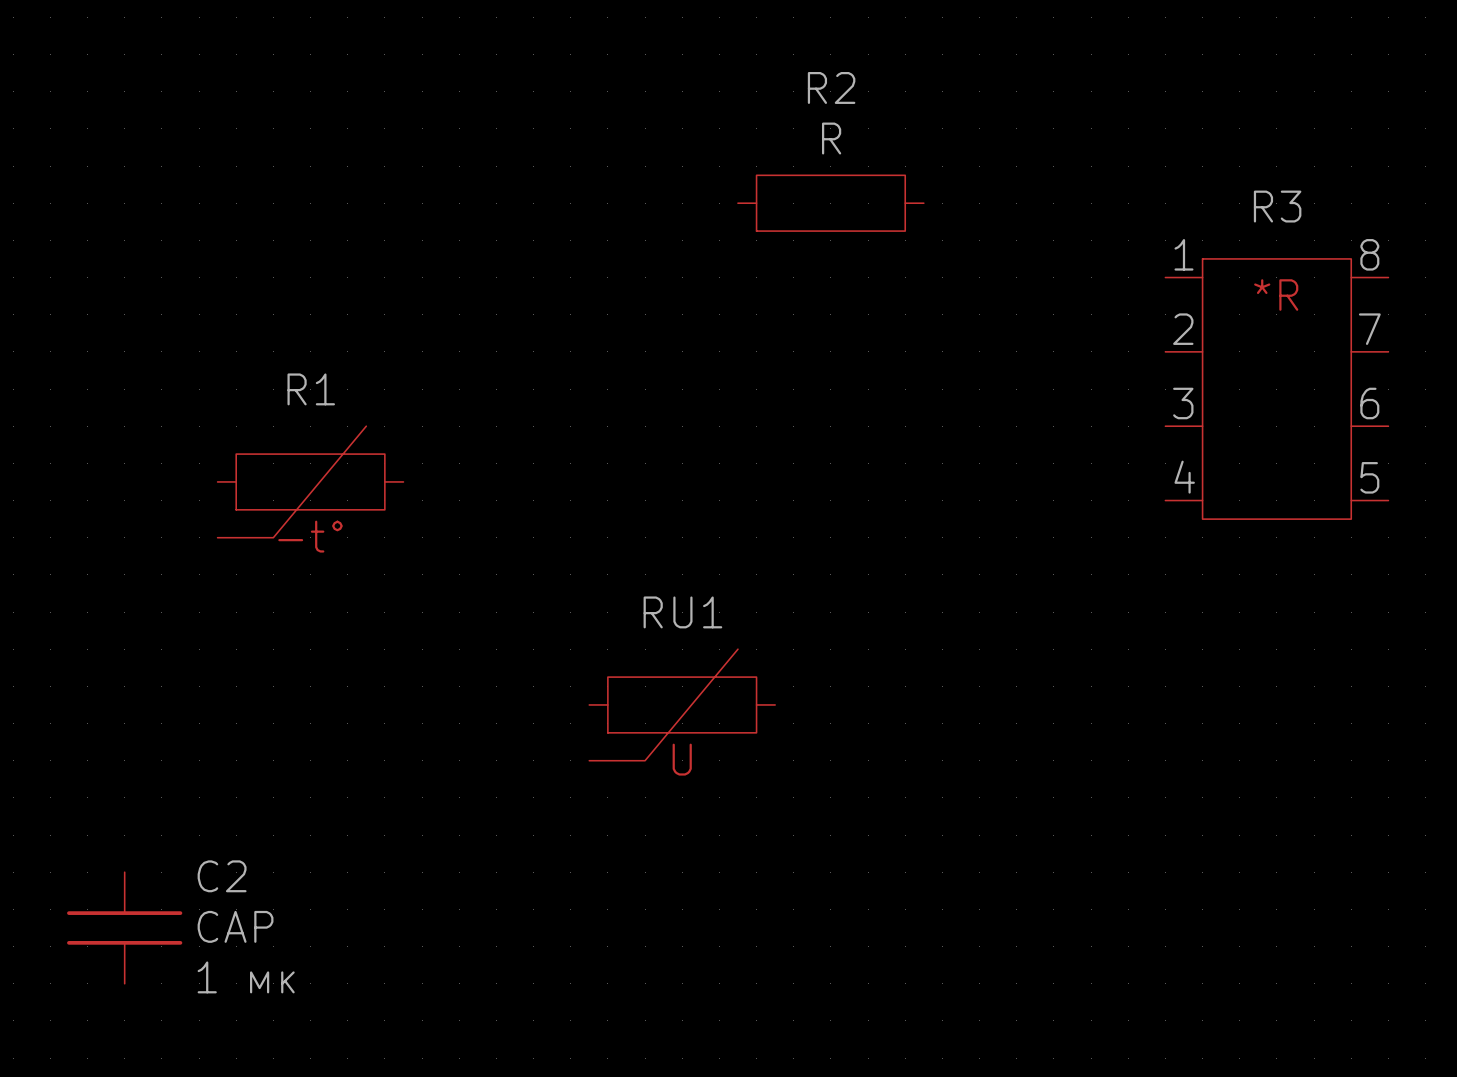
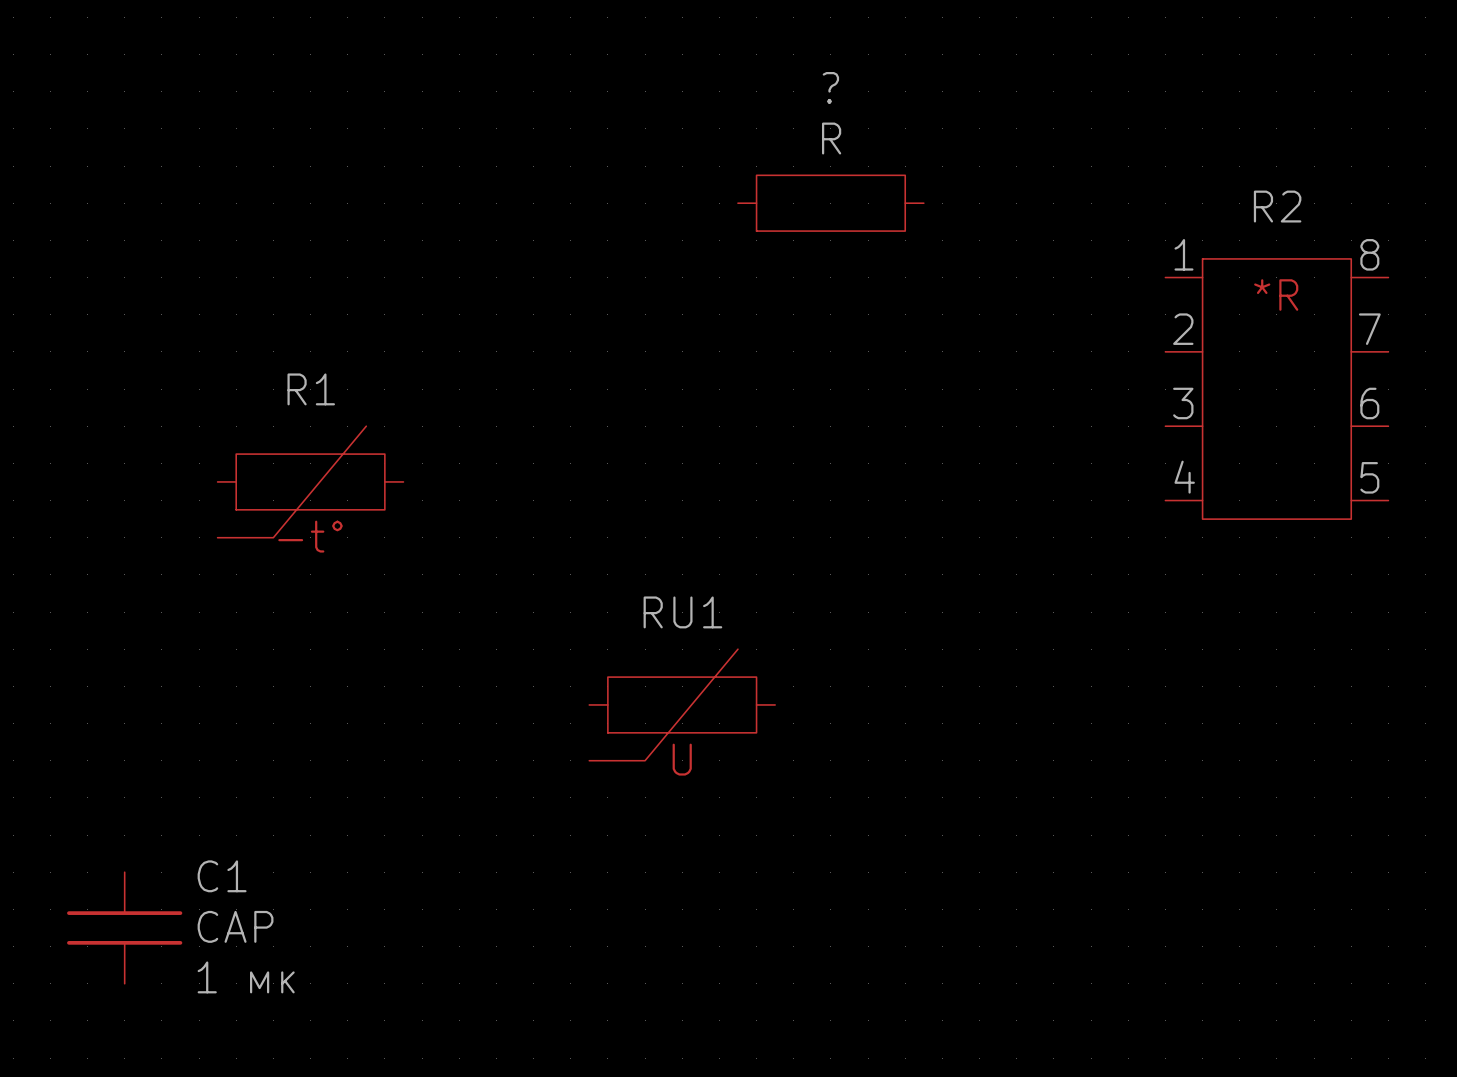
R2 name: R2 (831, 87) -> ? (830, 87)
R3 name: R3 (1277, 206) -> R2 (1277, 206)
C2 name: C2 (222, 876) -> C1 (222, 876)

